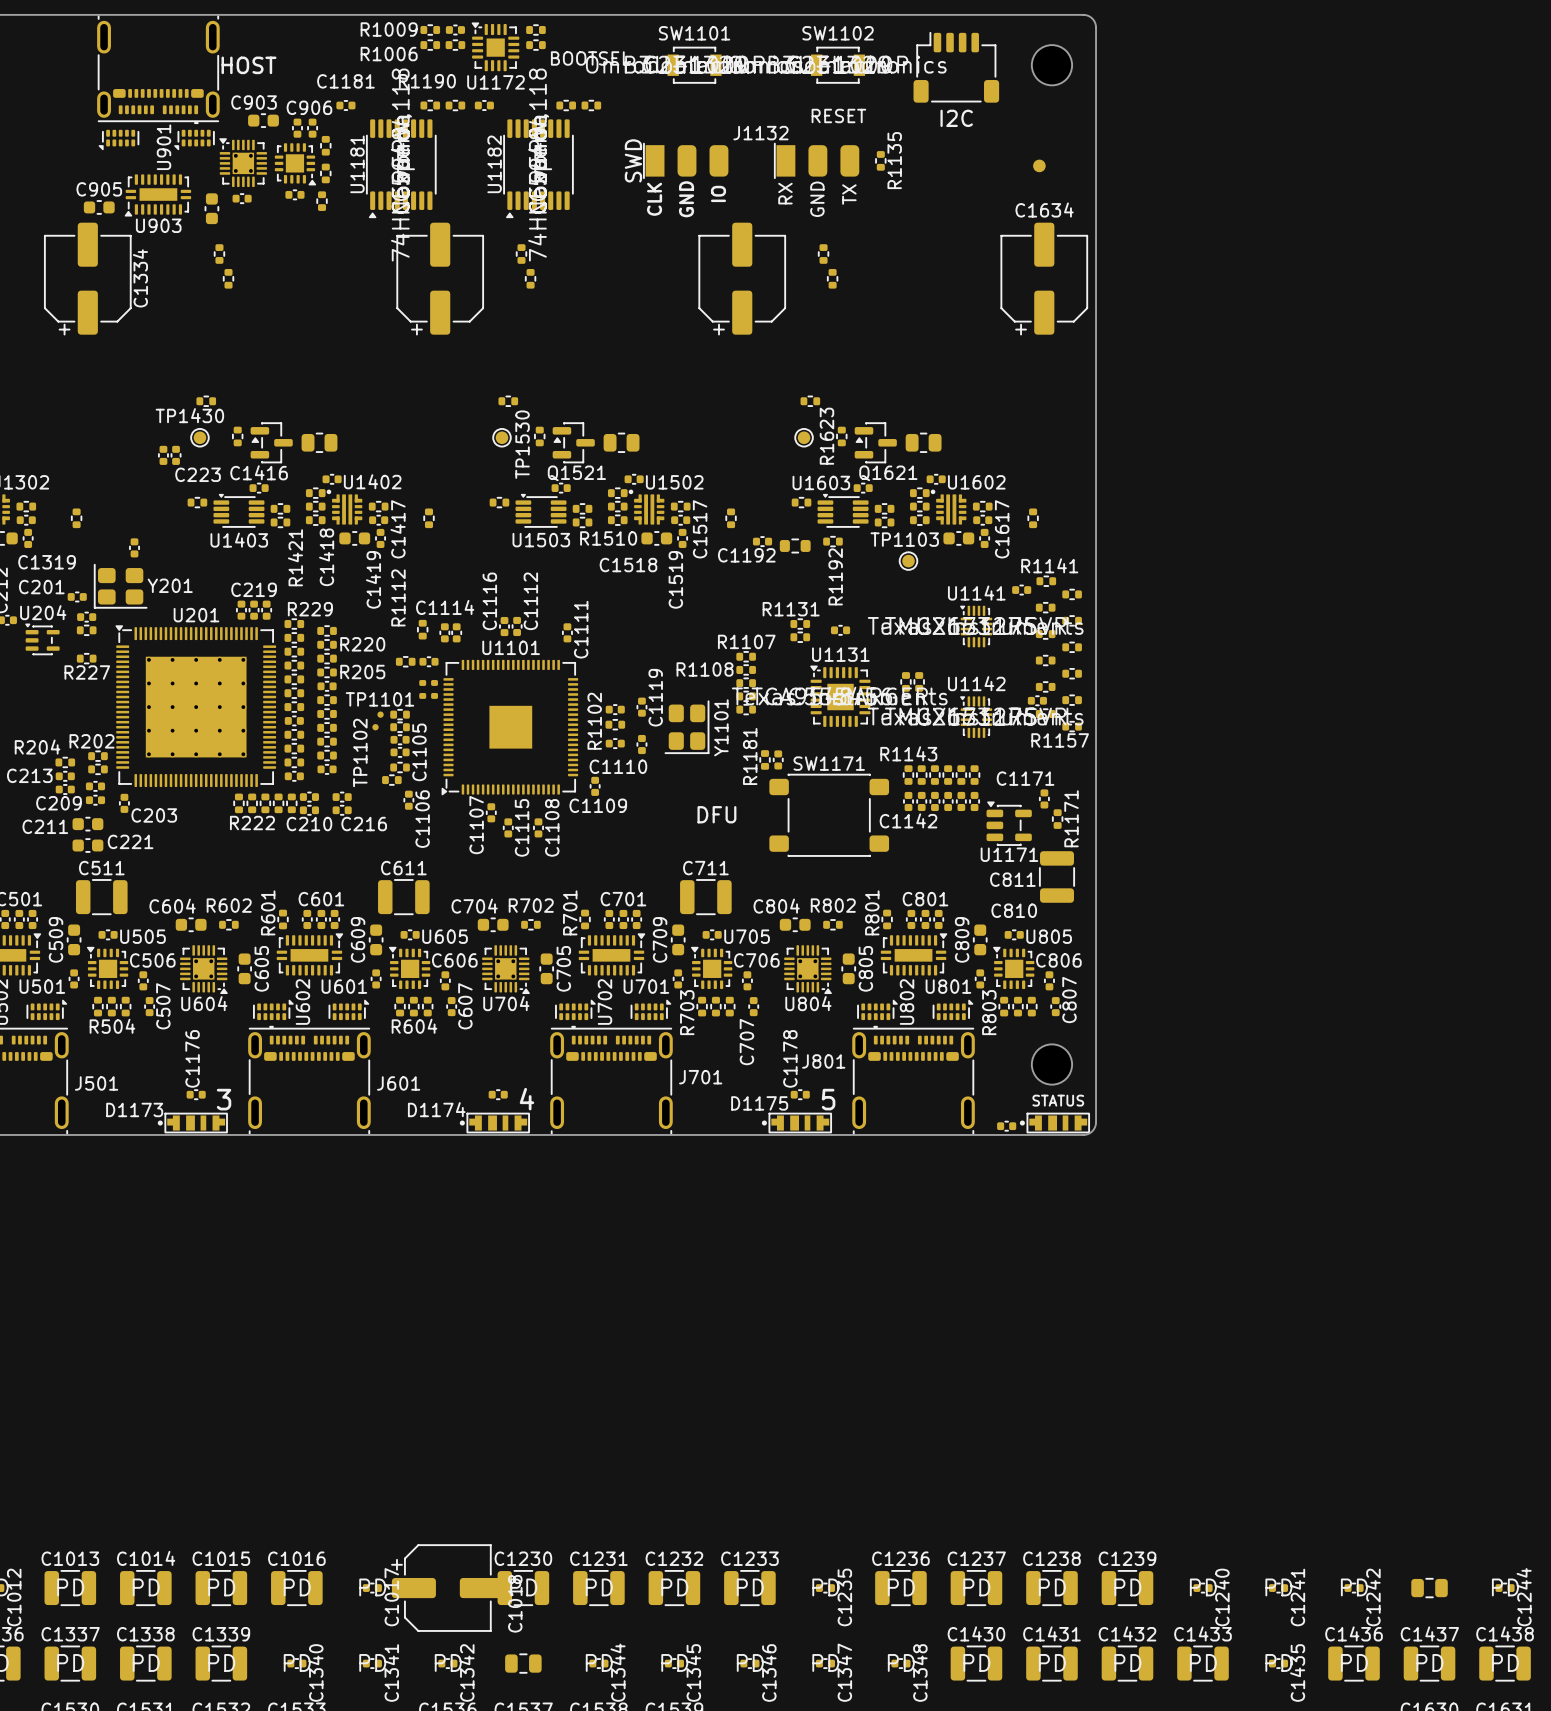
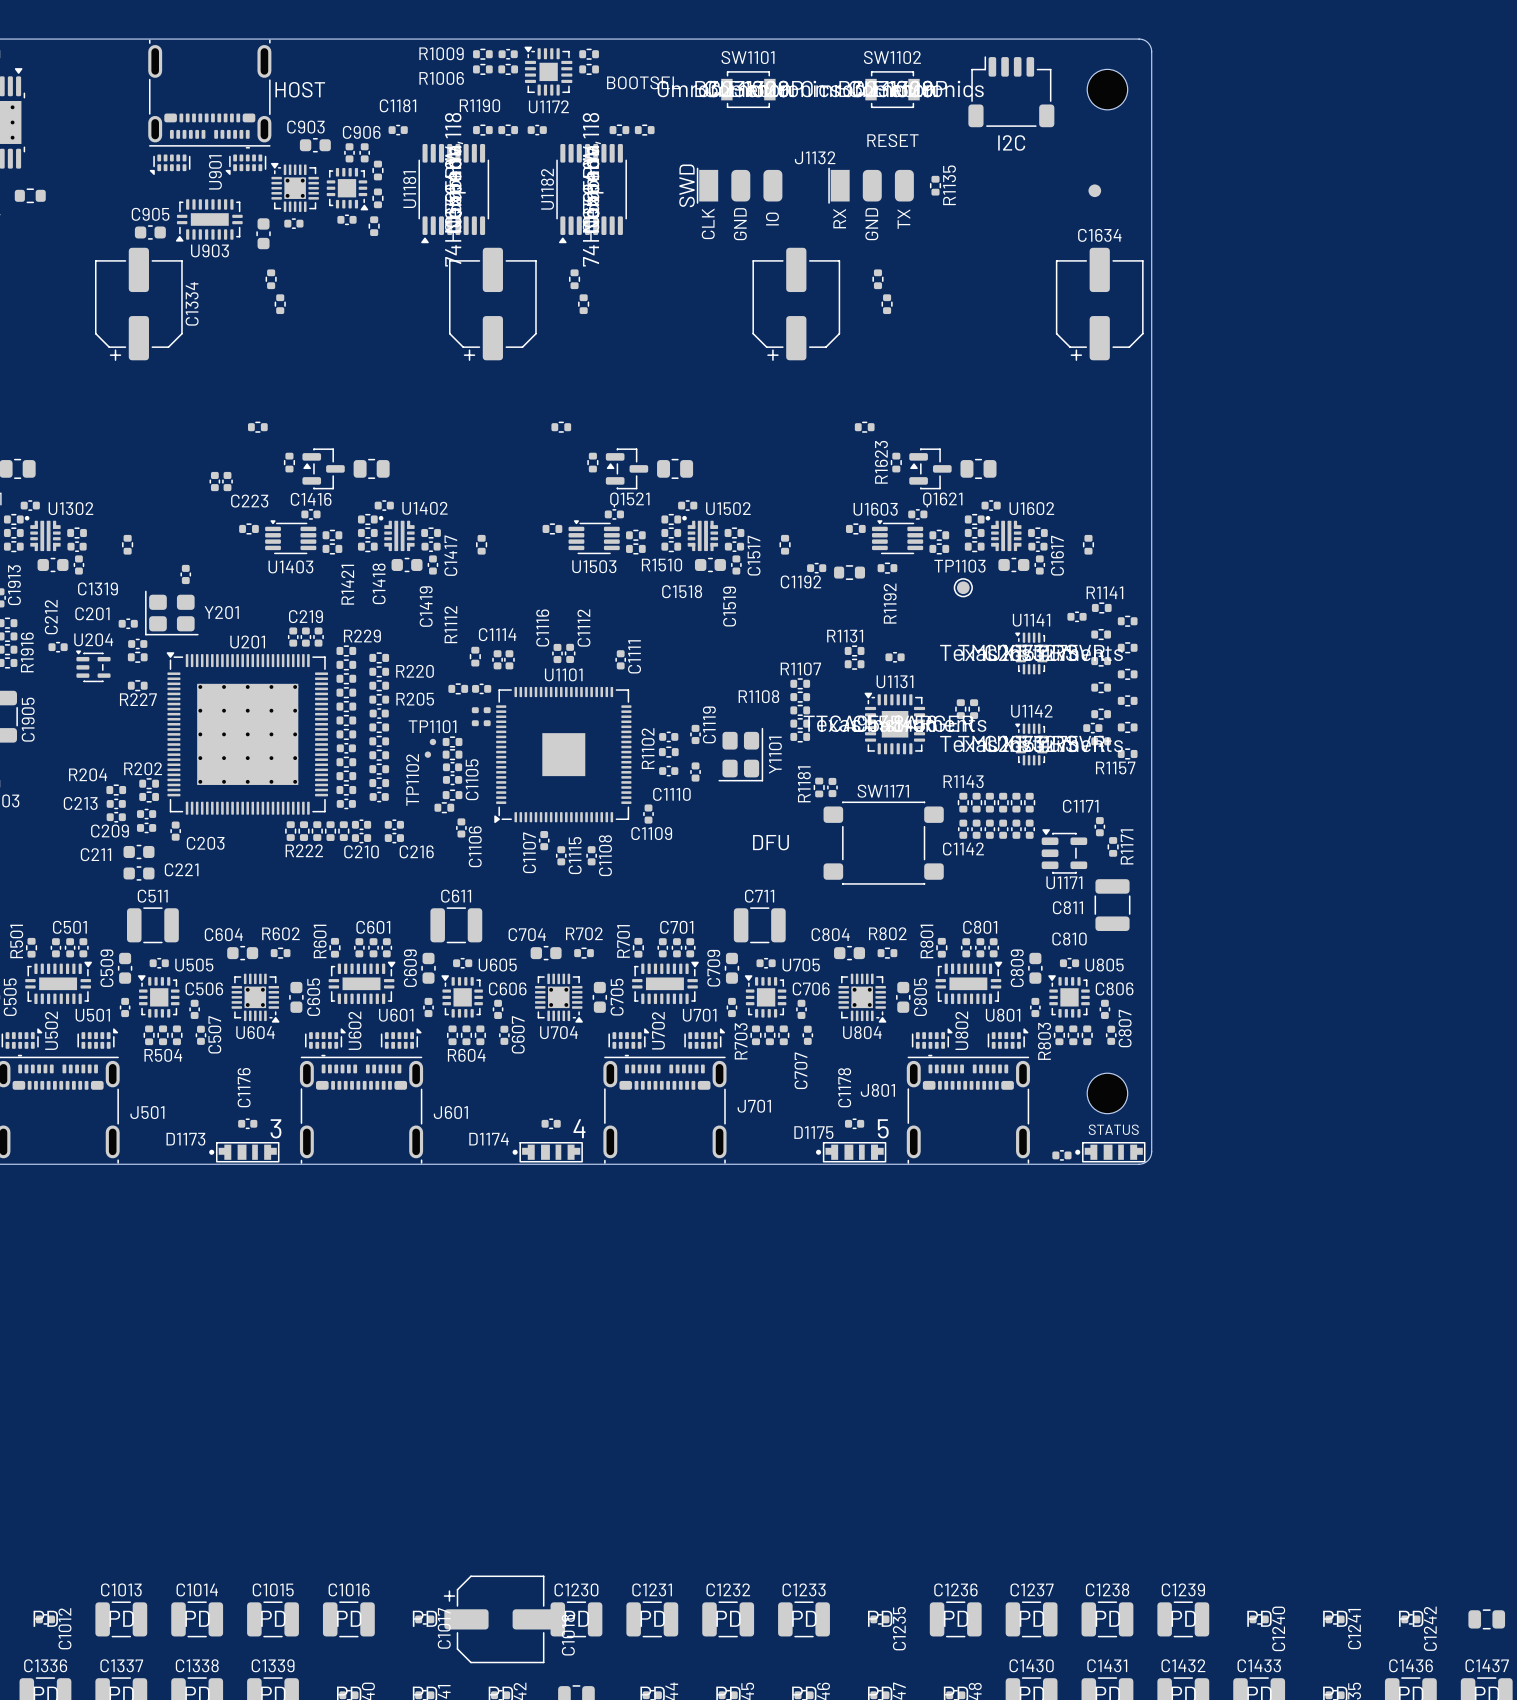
TP1430: (199, 437) -> none
TP1530: (501, 437) -> none
part: (804, 437) -> none

